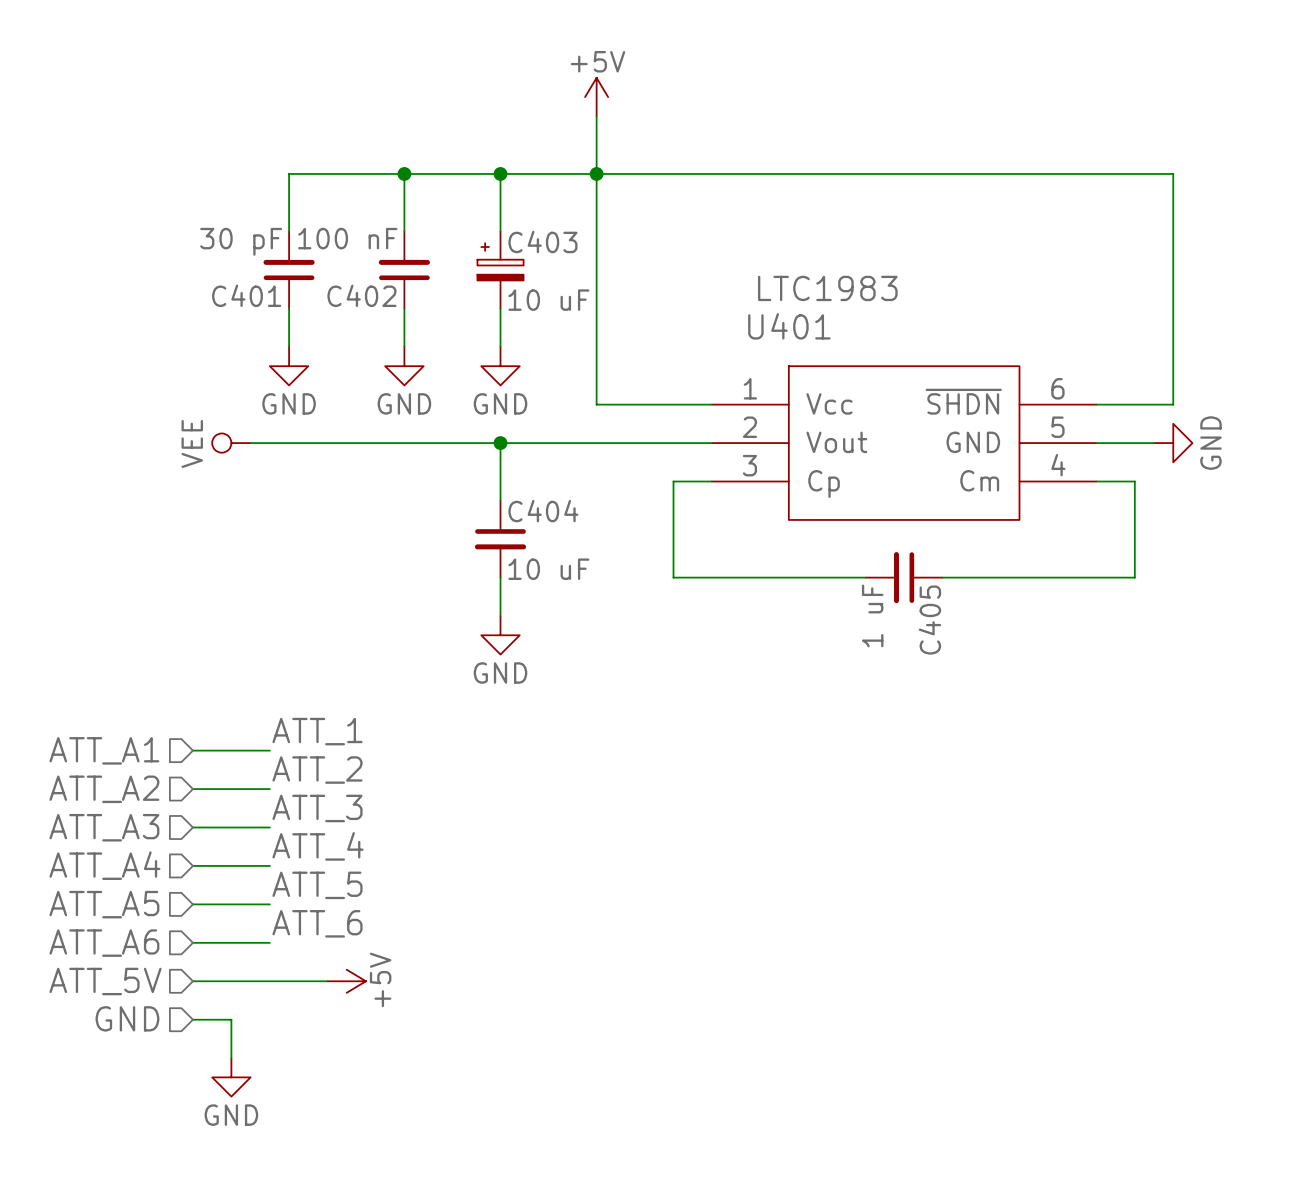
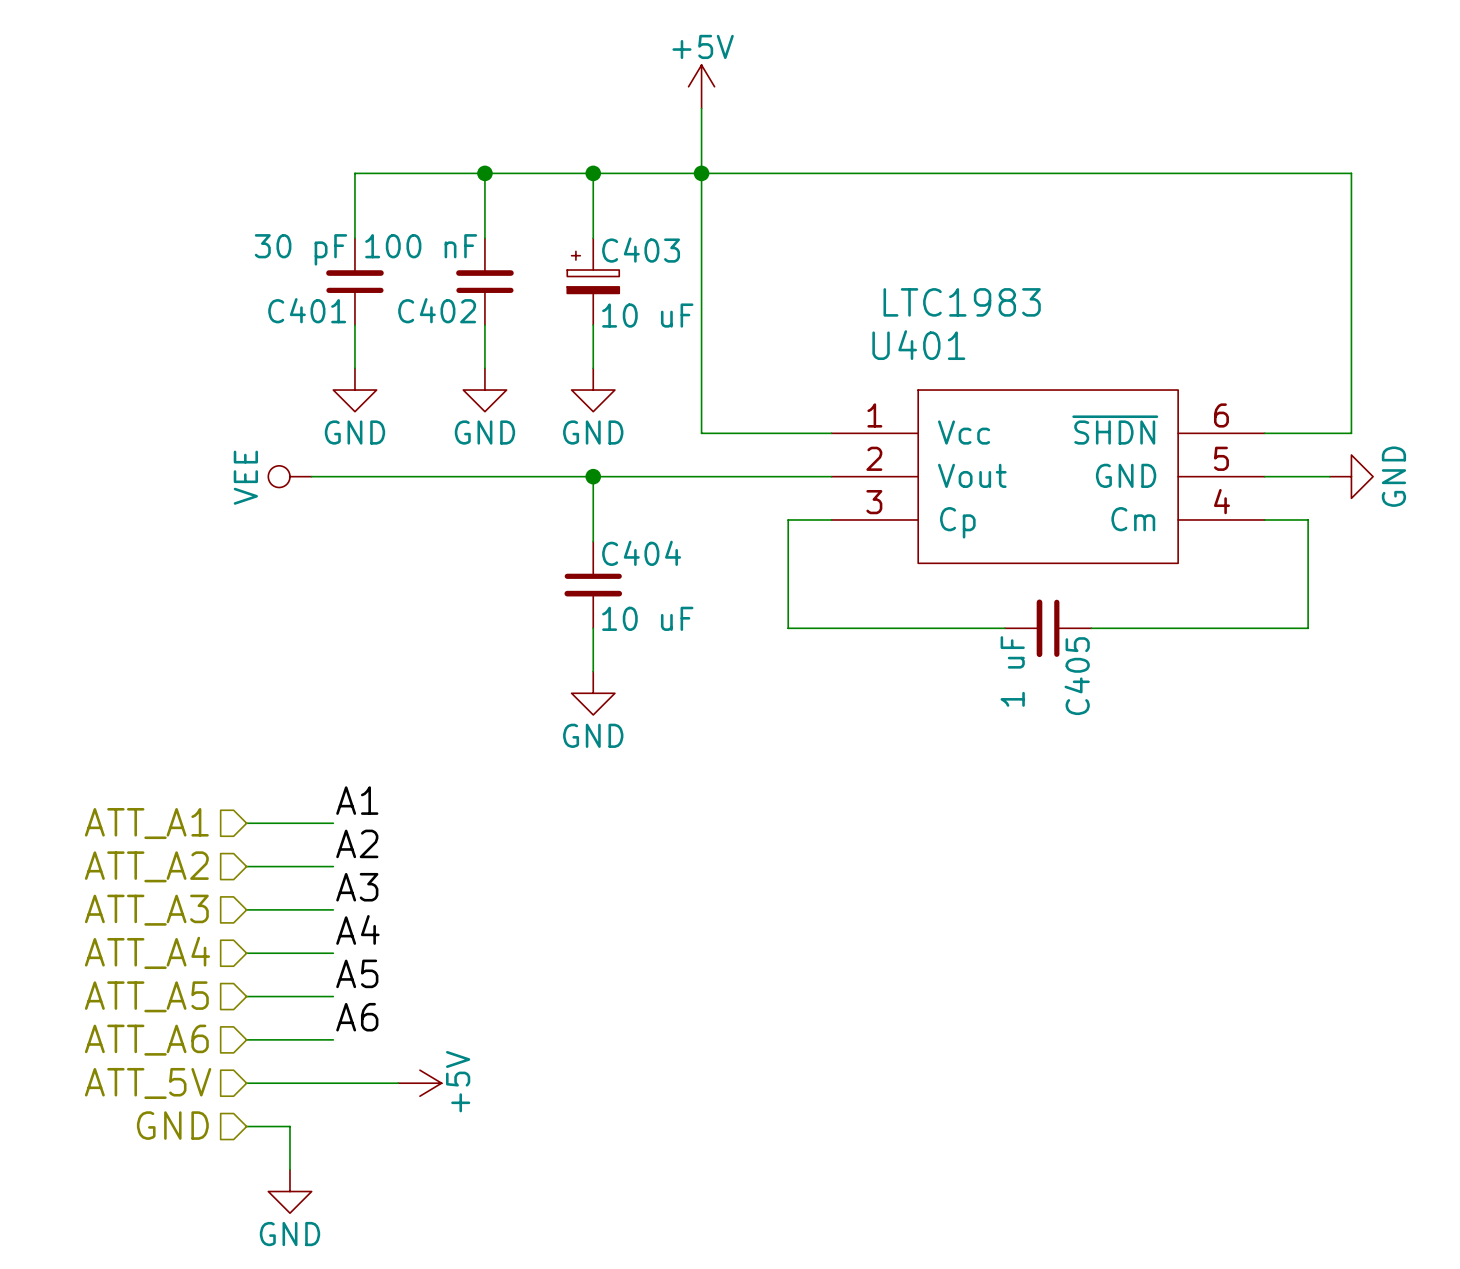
label: ATT_1 (317, 731) -> A1 (357, 800)
label: ATT_2 (317, 770) -> A2 (357, 843)
label: ATT_3 (317, 808) -> A3 (357, 887)
label: ATT_4 (318, 846) -> A4 (357, 929)
label: ATT_5 (317, 885) -> A5 (357, 973)
label: ATT_6 (317, 923) -> A6 (357, 1017)

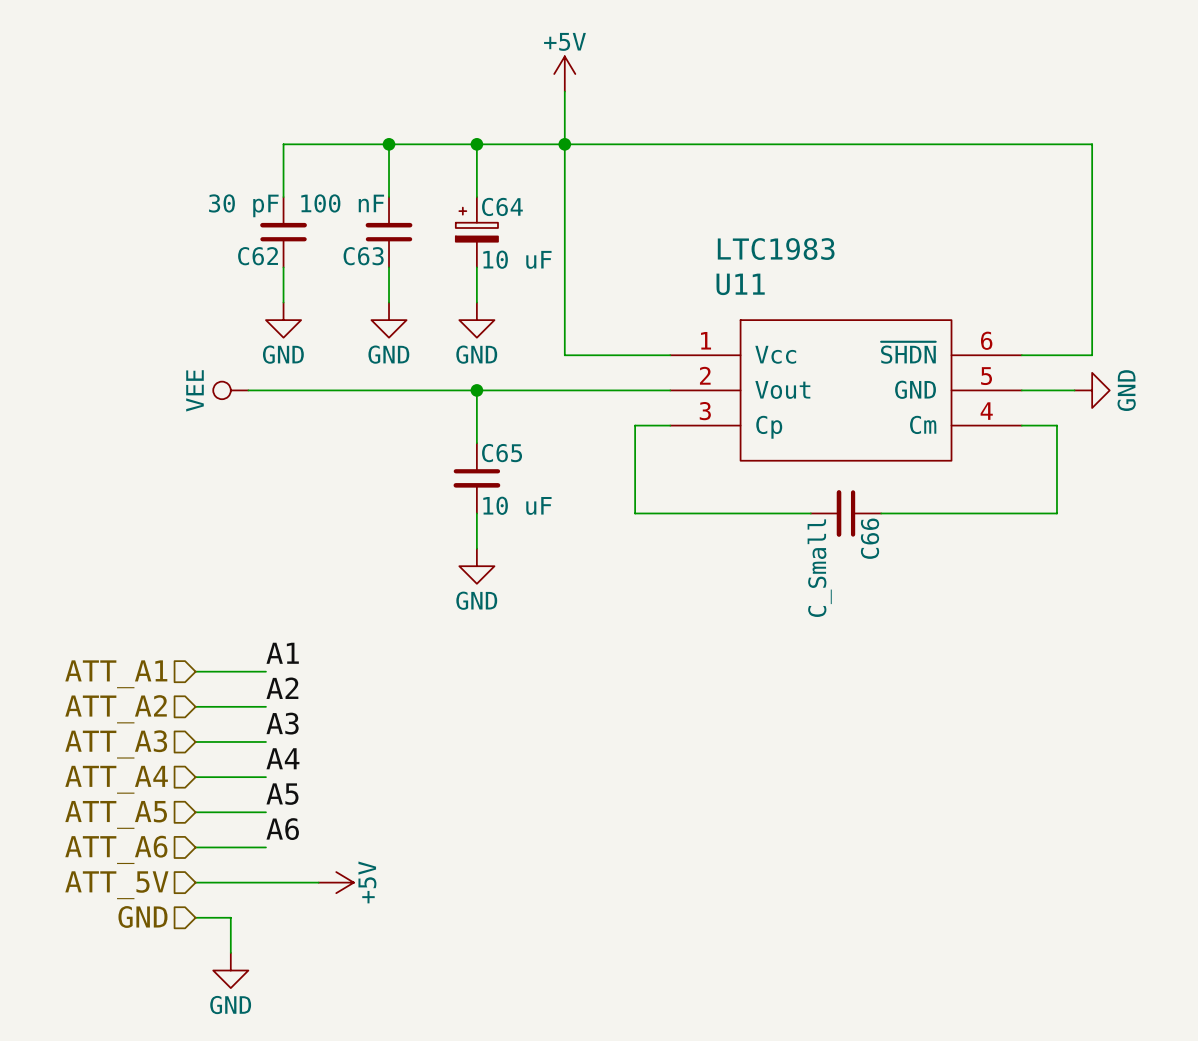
C403 name: C403 (641, 250) -> C64 (502, 206)
C401 name: C401 (307, 310) -> C62 (258, 256)
C402 name: C402 (437, 310) -> C63 (363, 256)
U401 name: U401 (918, 345) -> U11 (740, 284)
C404 name: C404 (641, 553) -> C65 (502, 453)
C405 value: 1 uF (1012, 671) -> C_Small (819, 568)
C405 name: C405 (1077, 676) -> C66 (870, 538)

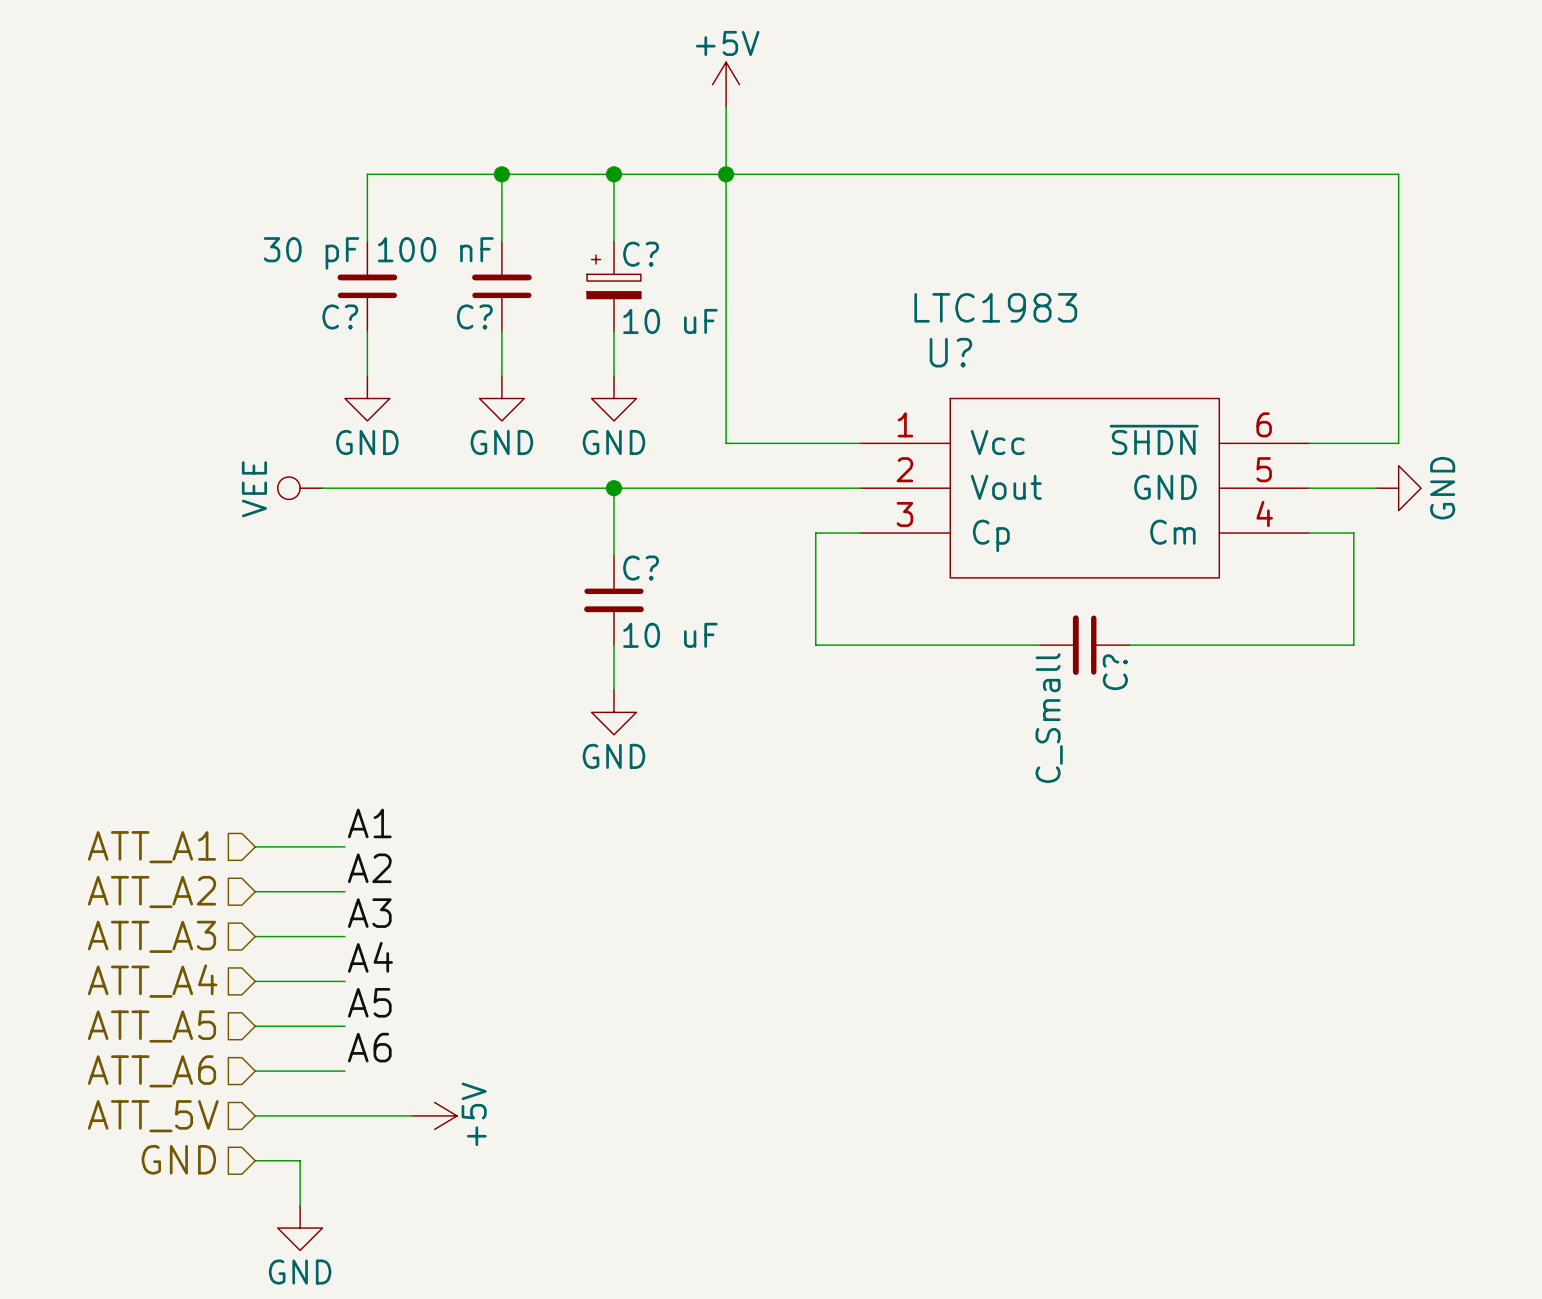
C64 name: C64 (502, 206) -> C? (641, 254)
C62 name: C62 (258, 256) -> C? (340, 316)
C63 name: C63 (363, 256) -> C? (474, 316)
U11 name: U11 (740, 284) -> U? (950, 352)
C65 name: C65 (502, 453) -> C? (641, 568)
C66 name: C66 (870, 538) -> C? (1115, 672)

